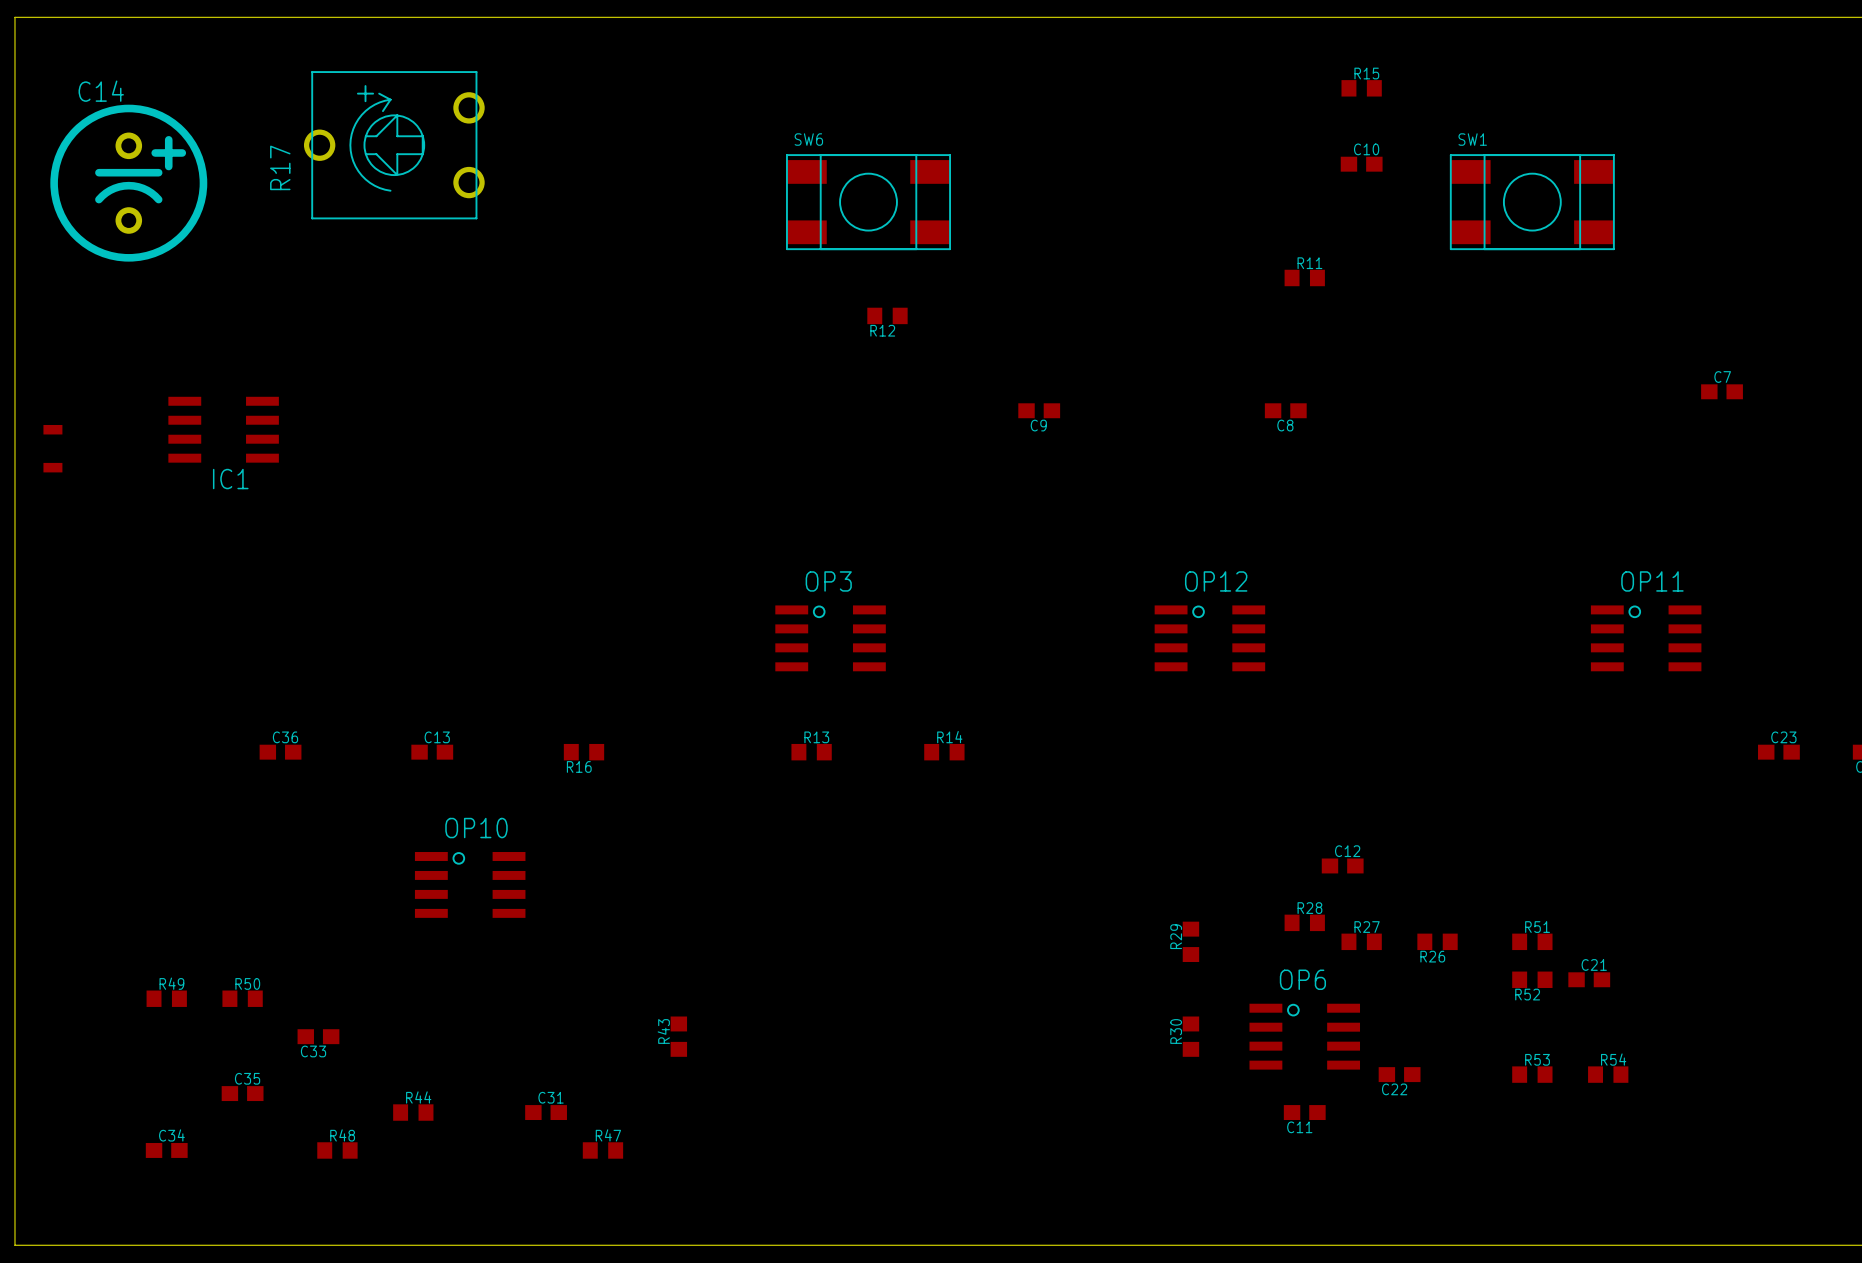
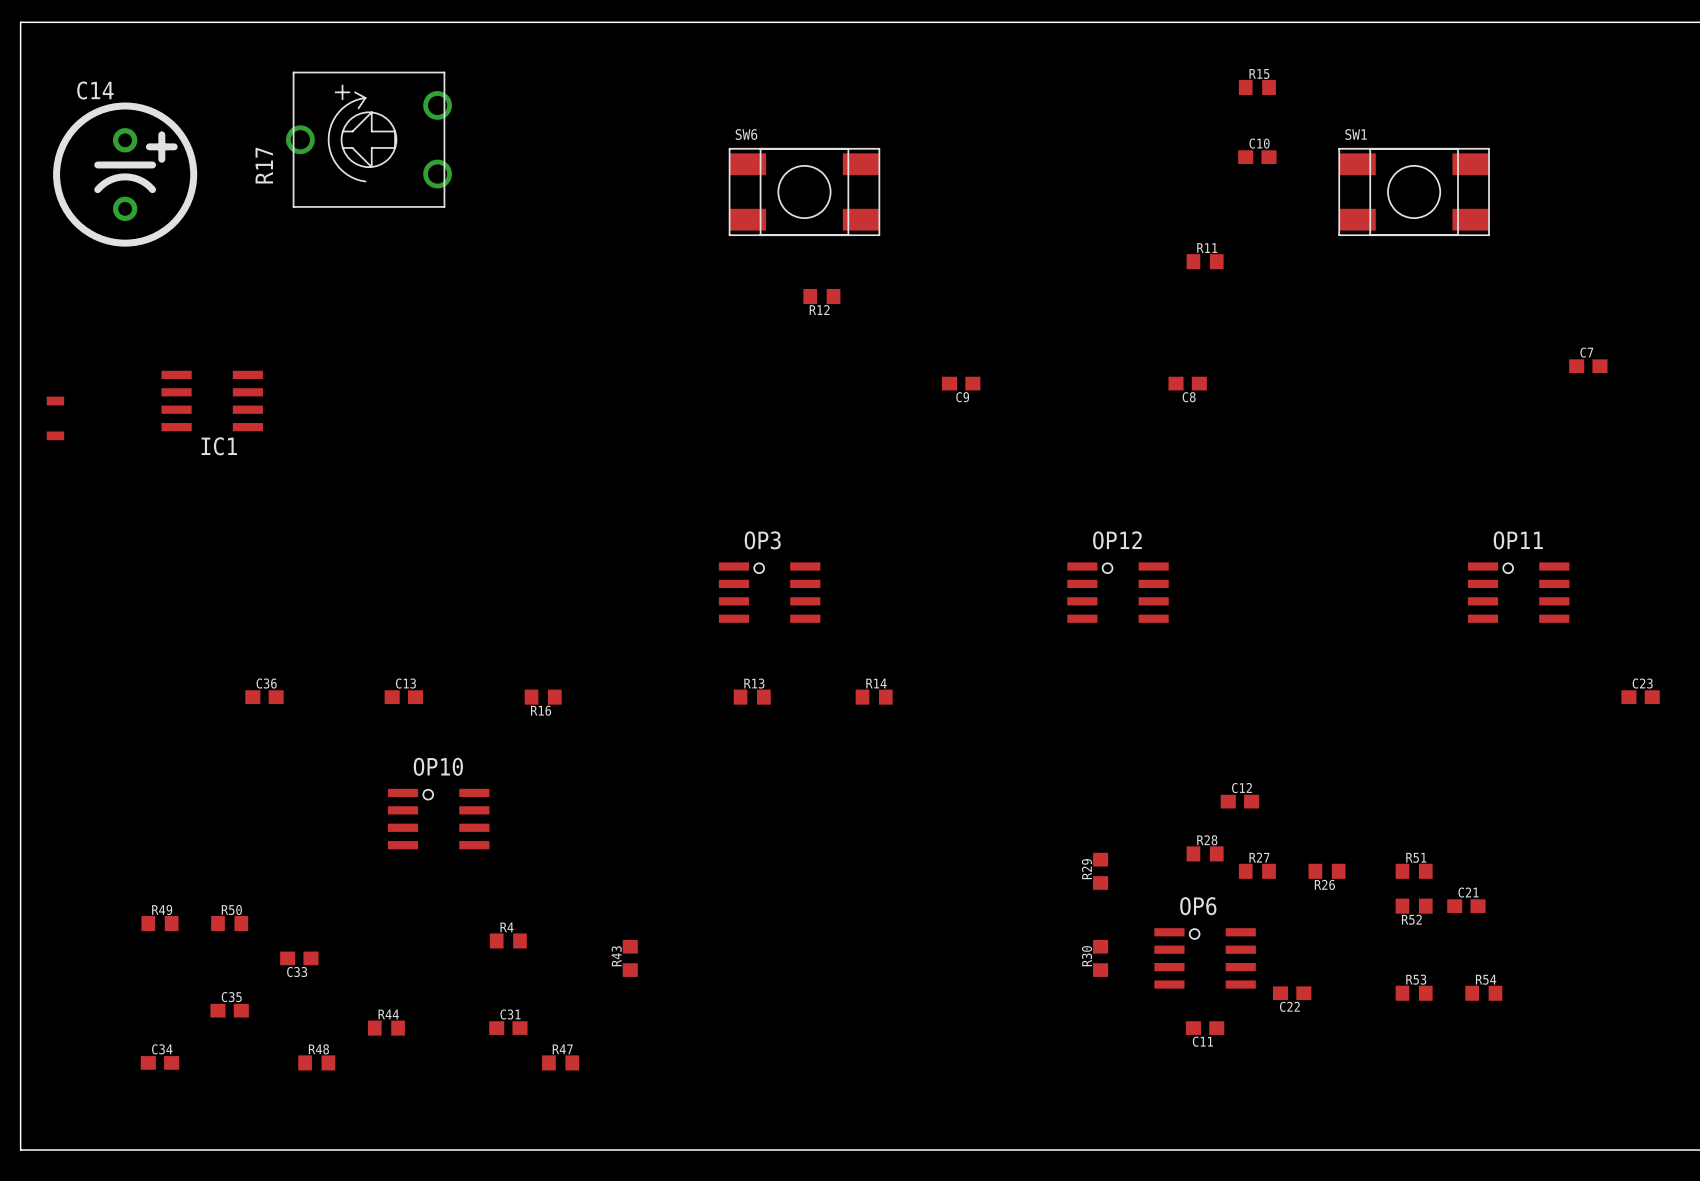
R4: none -> (508, 940)

